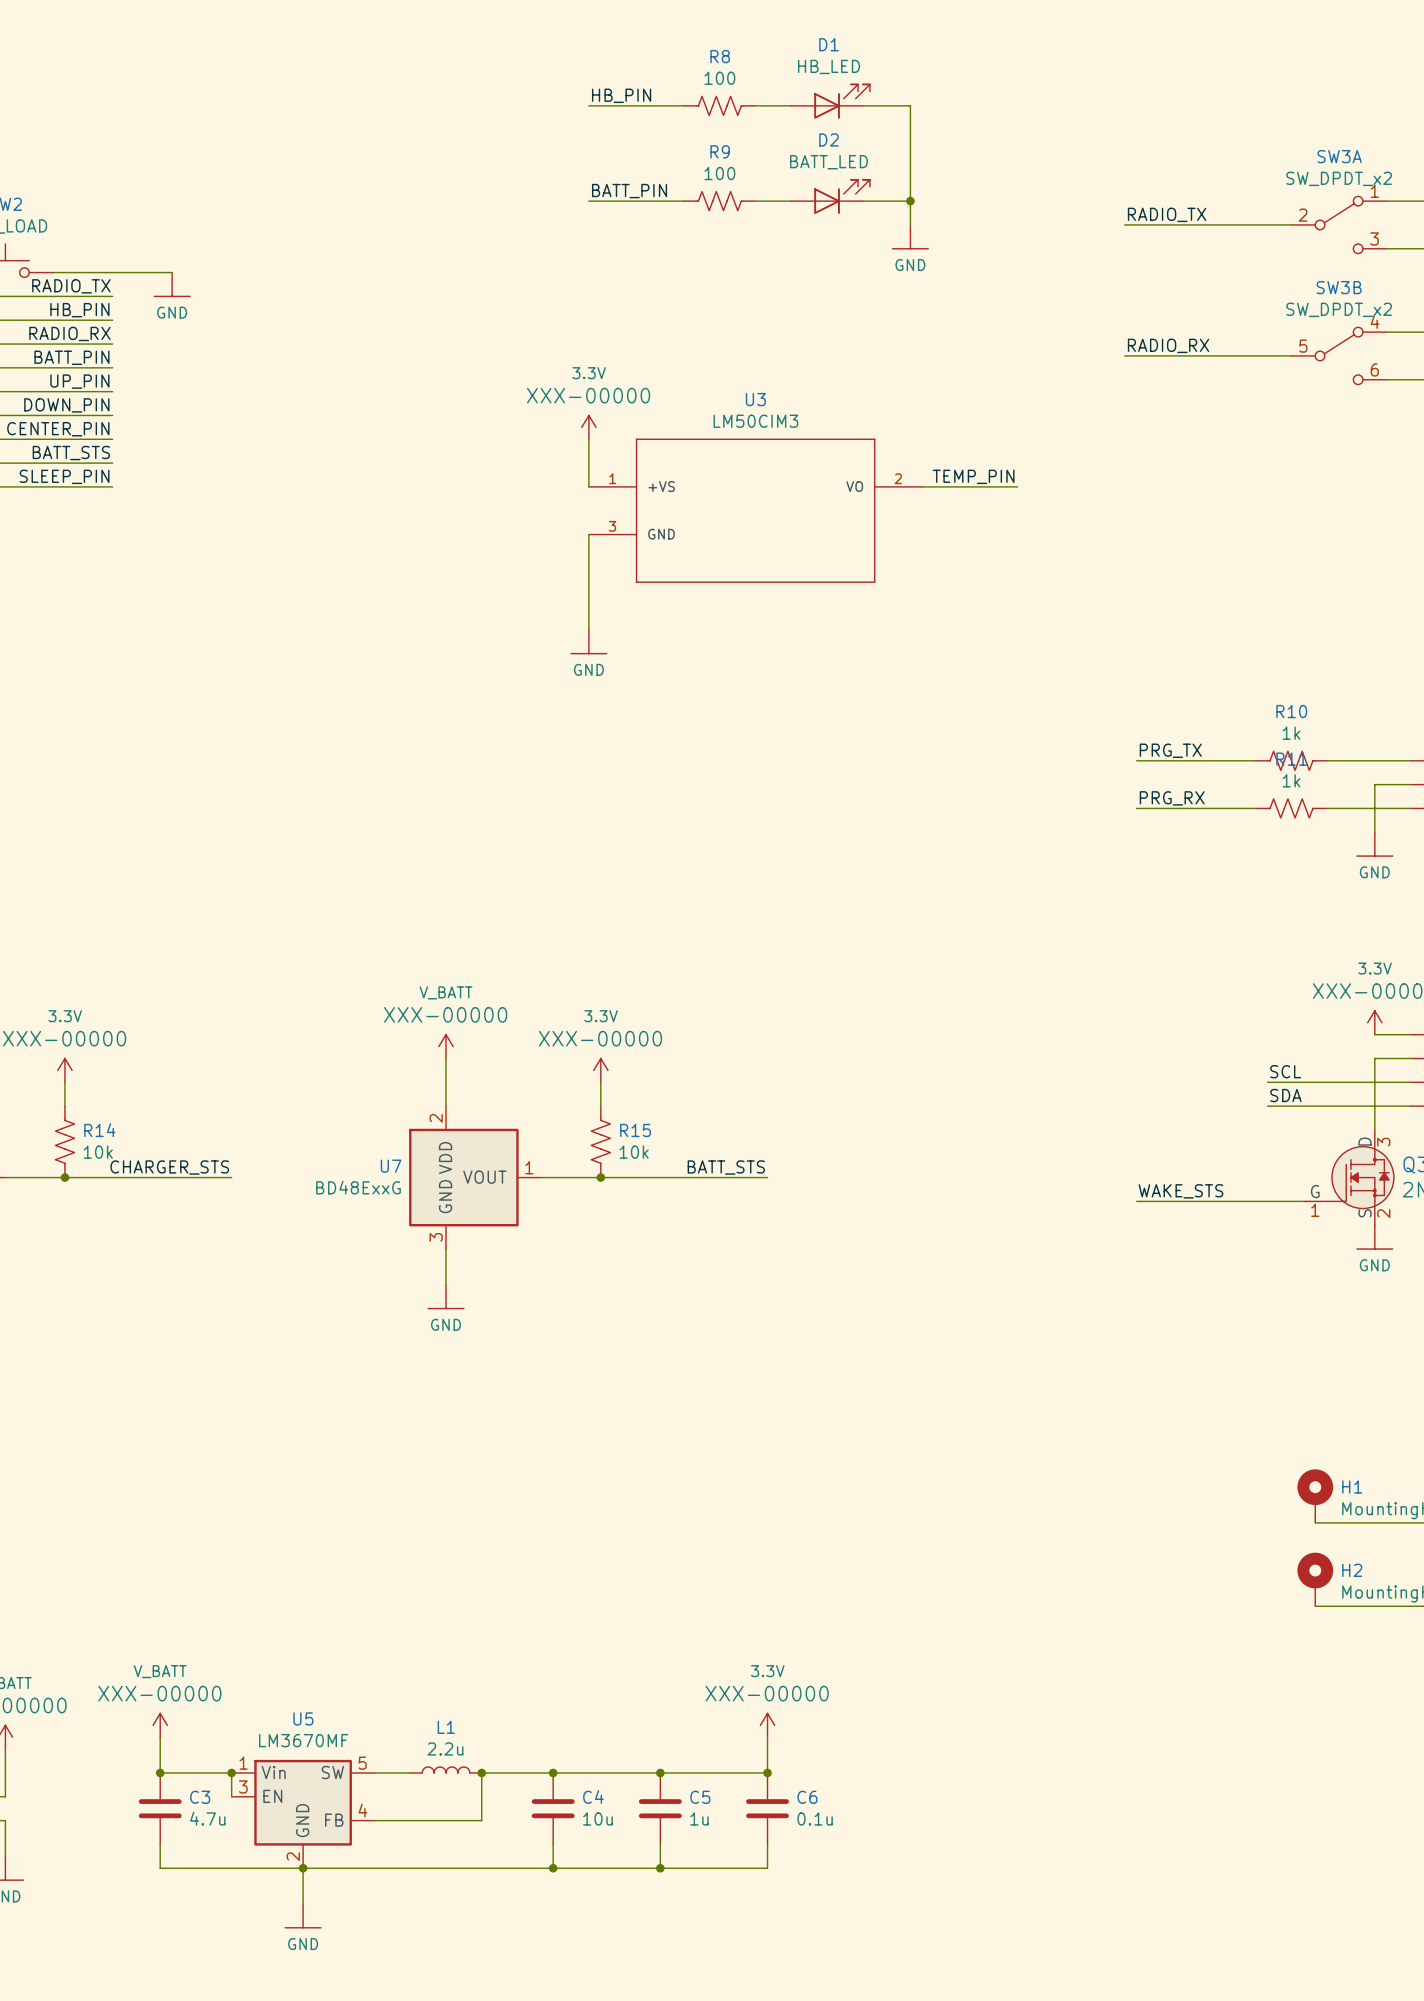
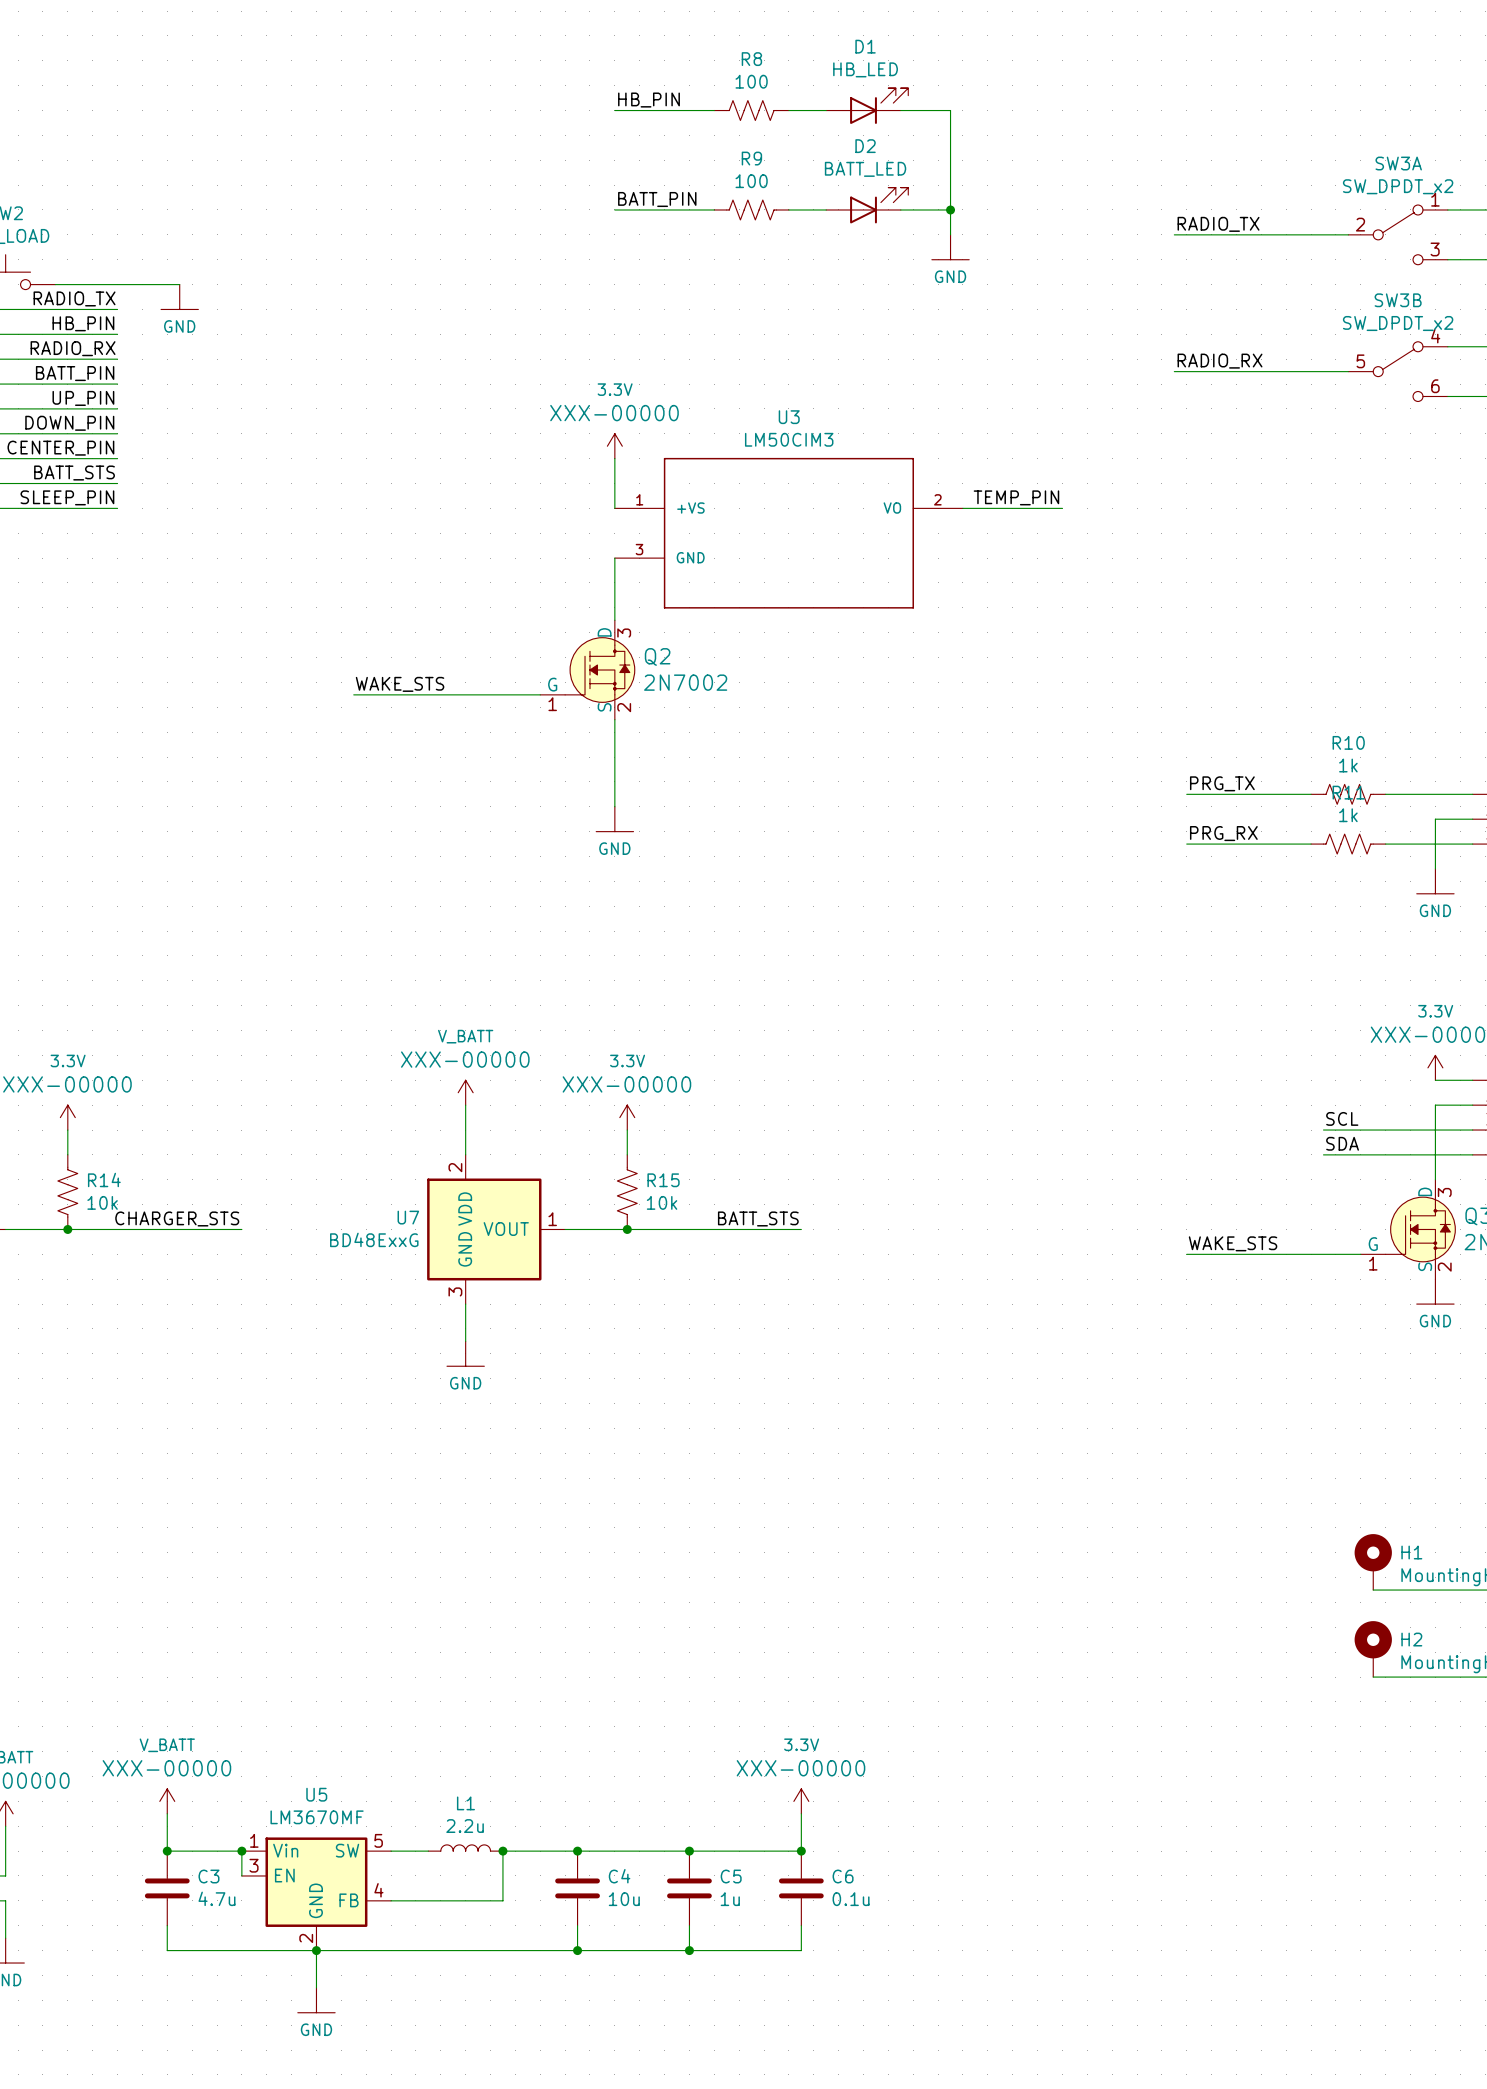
Q2: none -> 2N7002 (587, 670)
power symbol position: GND (588, 641) -> GND (614, 819)
label: none -> WAKE_STS (400, 684)
wire: none -> (353, 694) (540, 694)
wire: none -> (614, 719) (614, 806)

